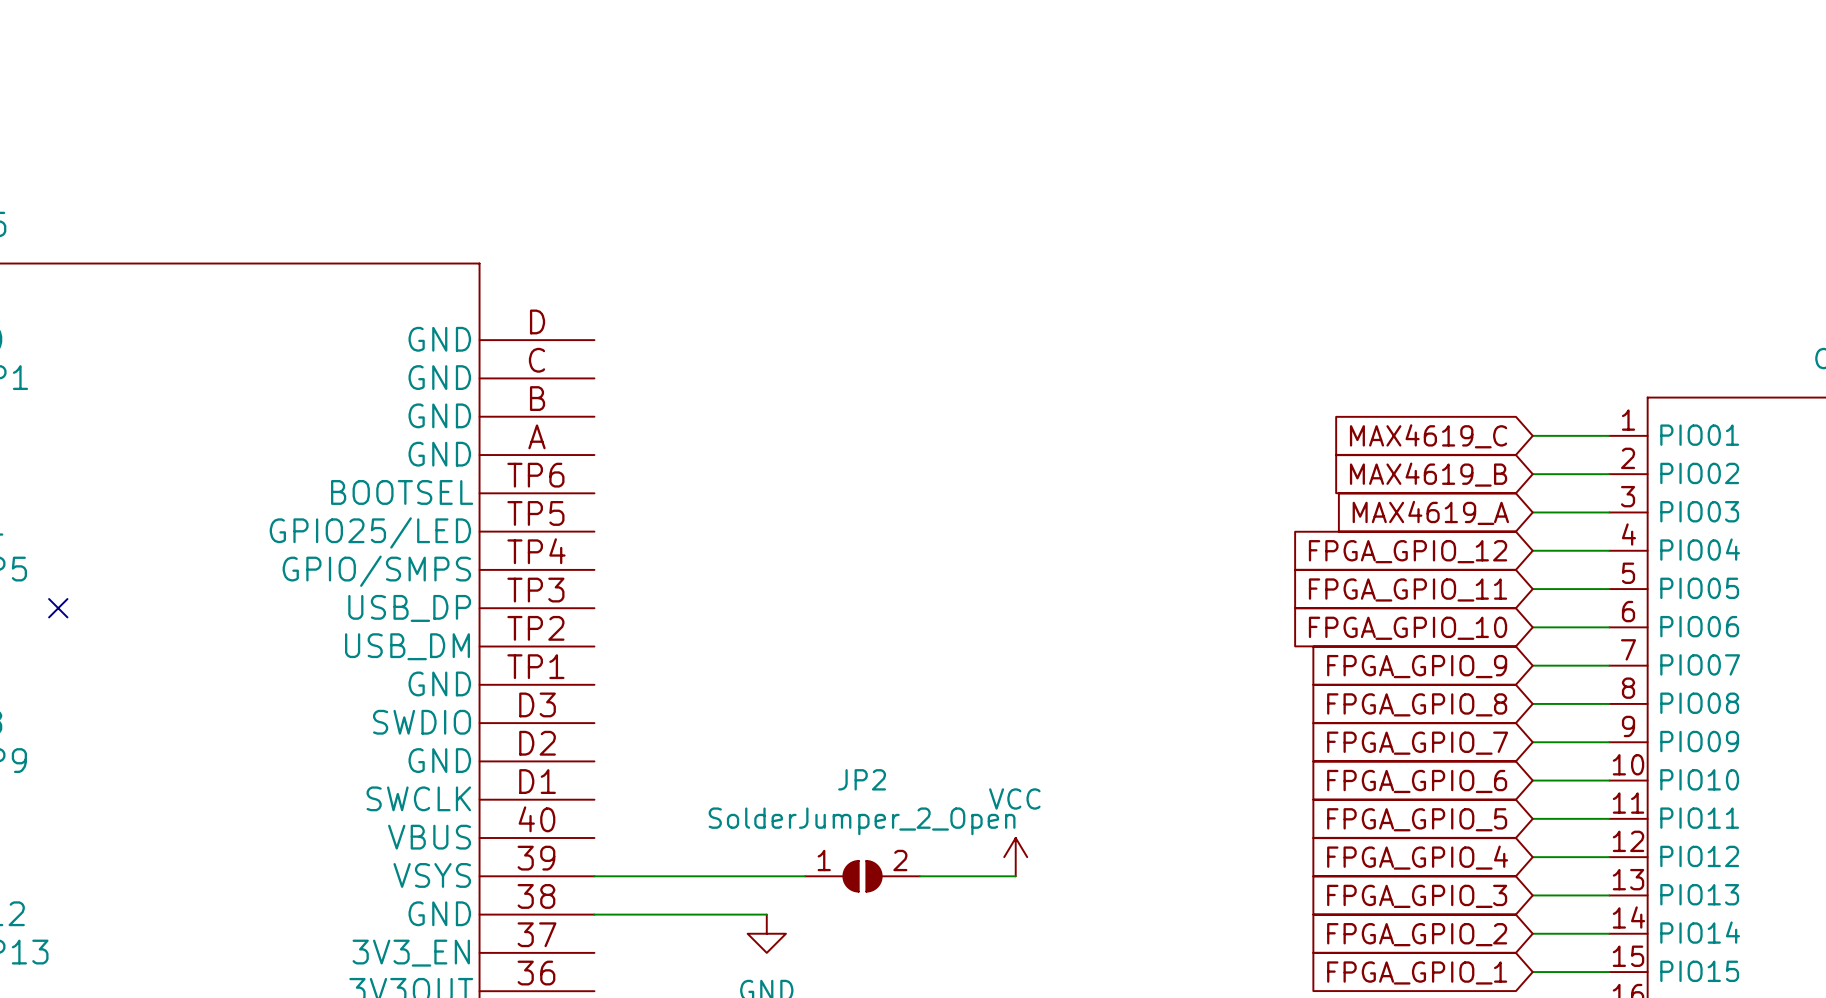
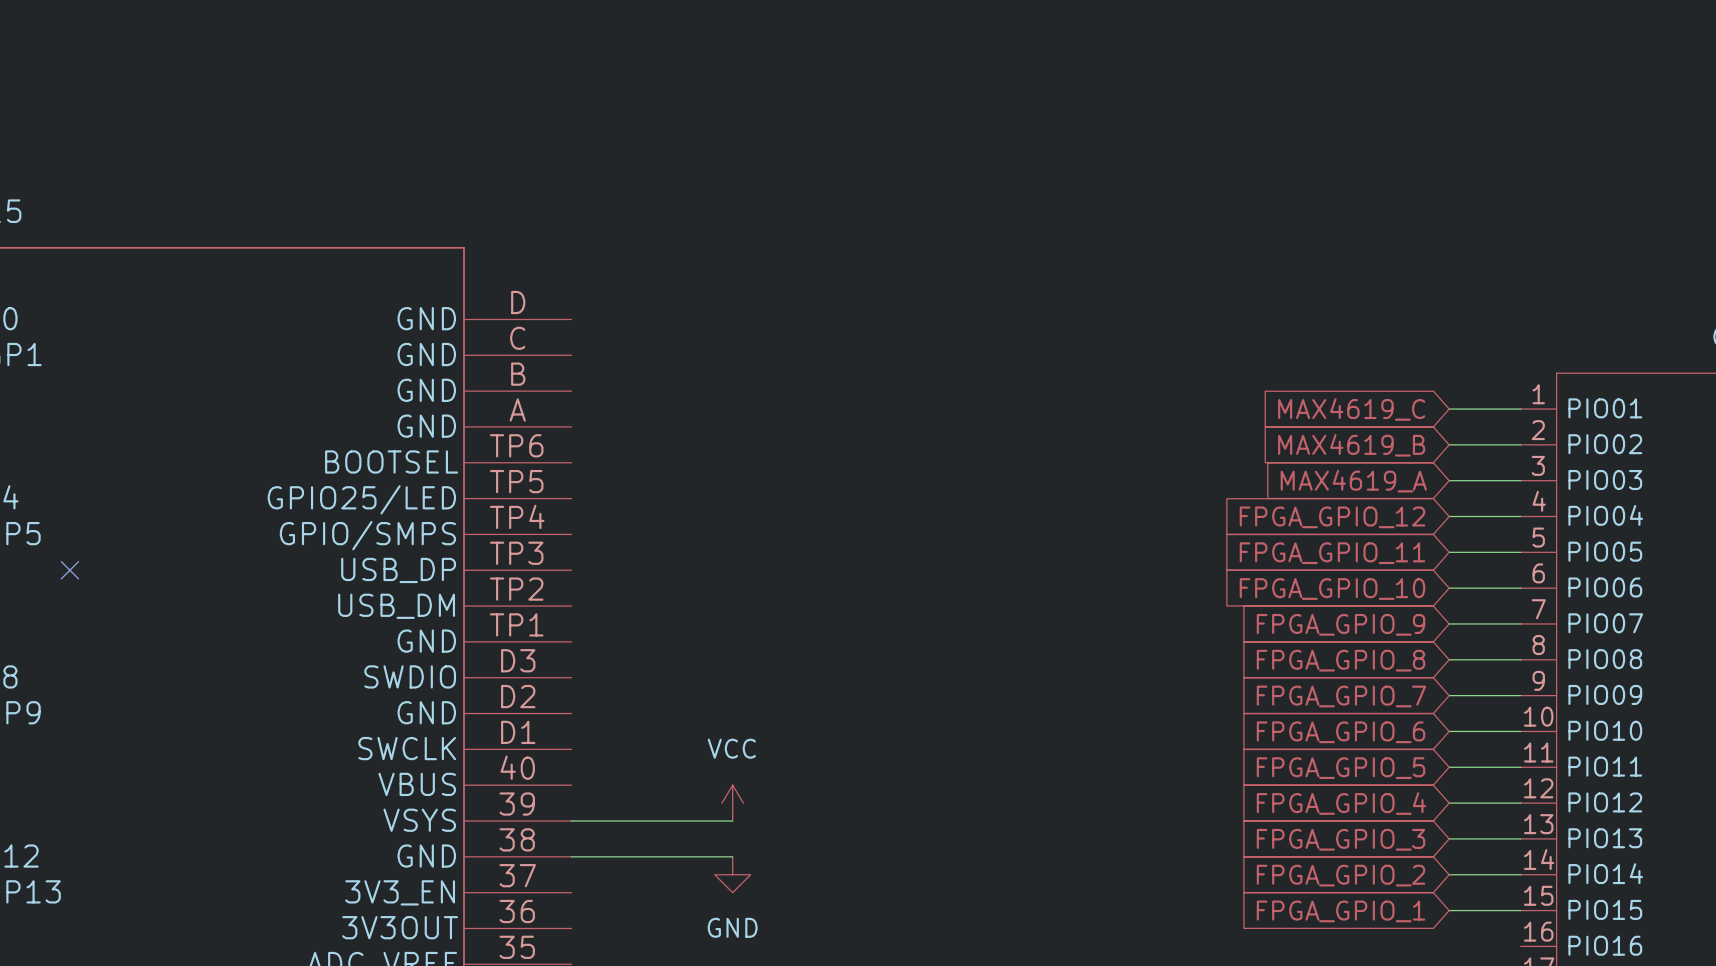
power symbol position: VCC (1015, 857) -> VCC (732, 803)
wire: (766, 876) (805, 876) -> none
JP2: SolderJumper_2_Open (862, 876) -> none
wire: (919, 876) (1015, 876) -> none

